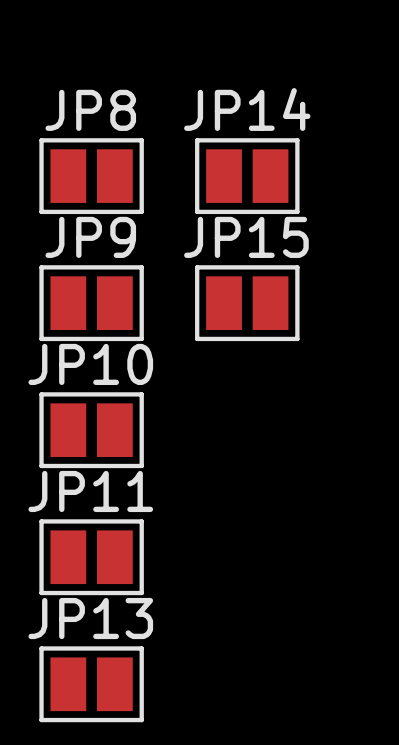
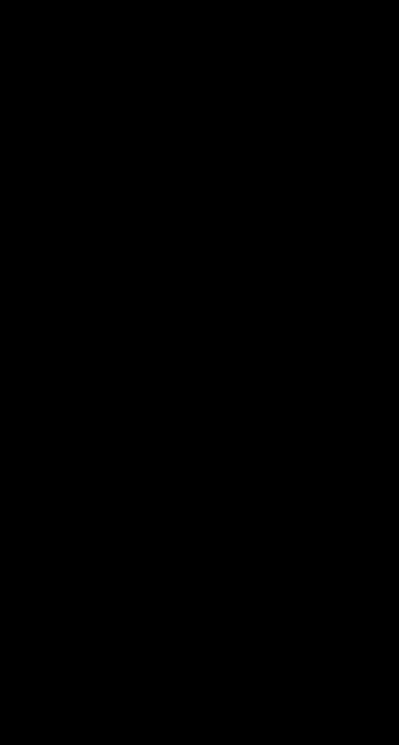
JP8: (91, 176) -> none
JP14: (247, 176) -> none
JP9: (91, 303) -> none
JP15: (247, 303) -> none
JP10: (91, 430) -> none
JP11: (91, 557) -> none
JP13: (91, 684) -> none

